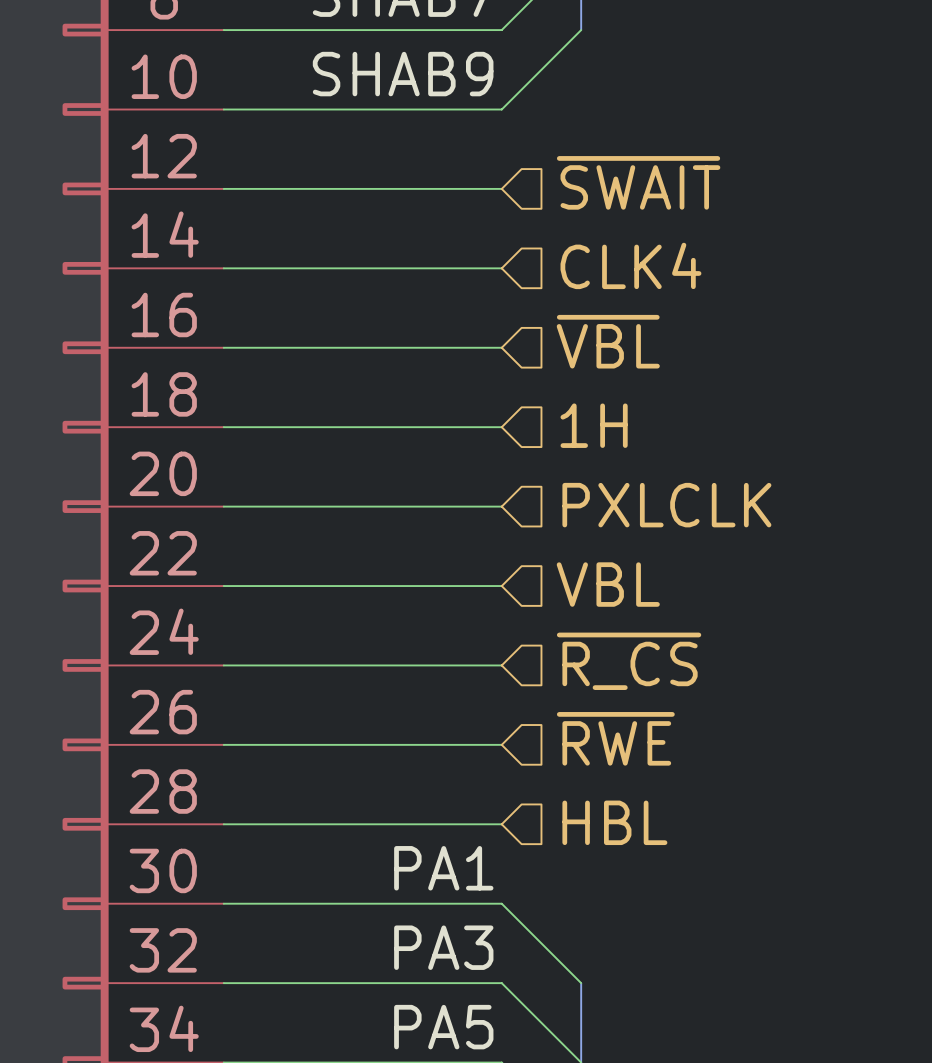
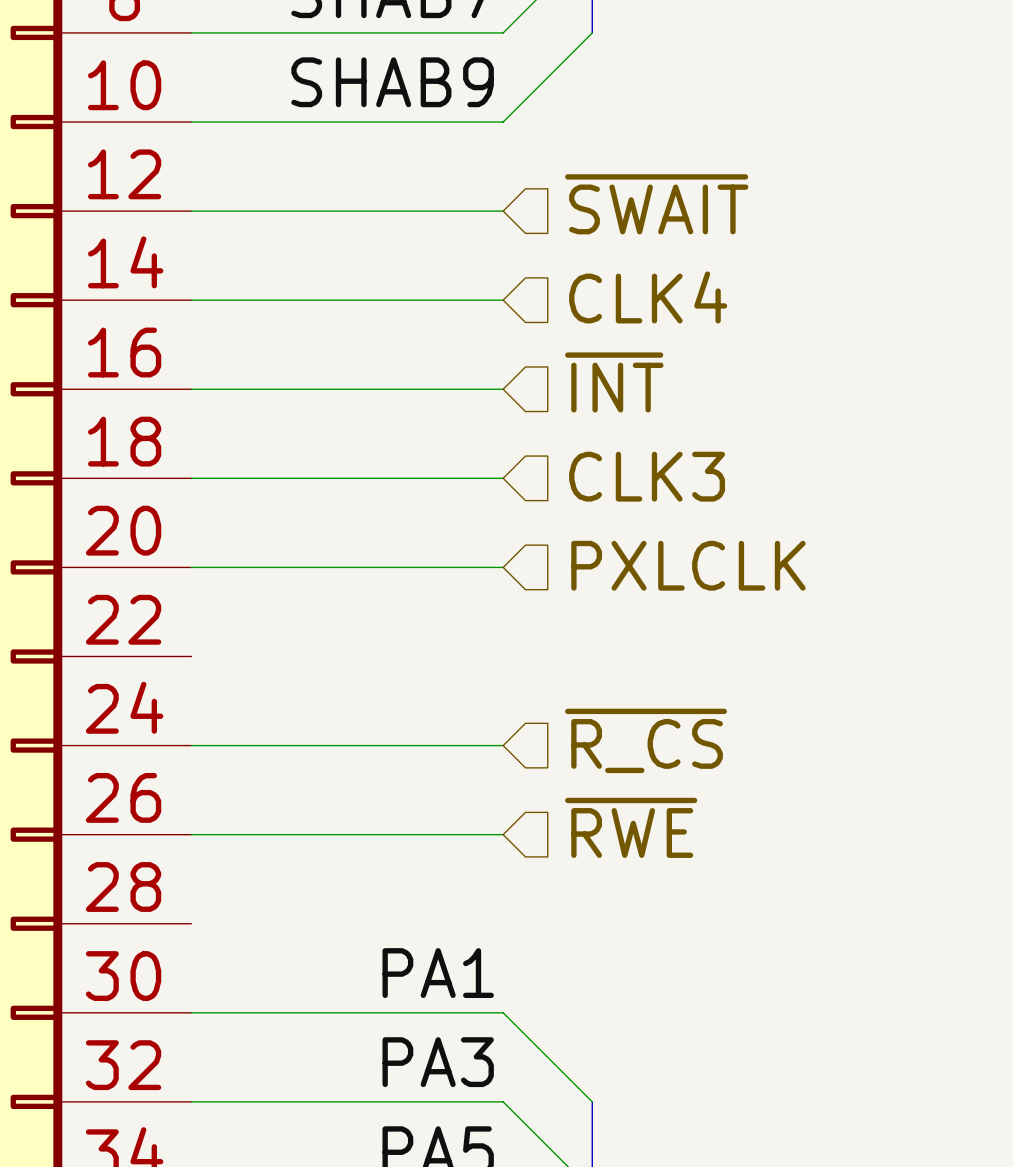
hierarchical label: ~{VBL} (608, 341) -> ~{INT} (614, 382)
hierarchical label: 1H (594, 425) -> CLK3 (647, 476)
hierarchical label: VBL (608, 584) -> none
wire: (223, 586) (501, 586) -> none
hierarchical label: HBL (614, 822) -> none
wire: (223, 824) (501, 824) -> none

